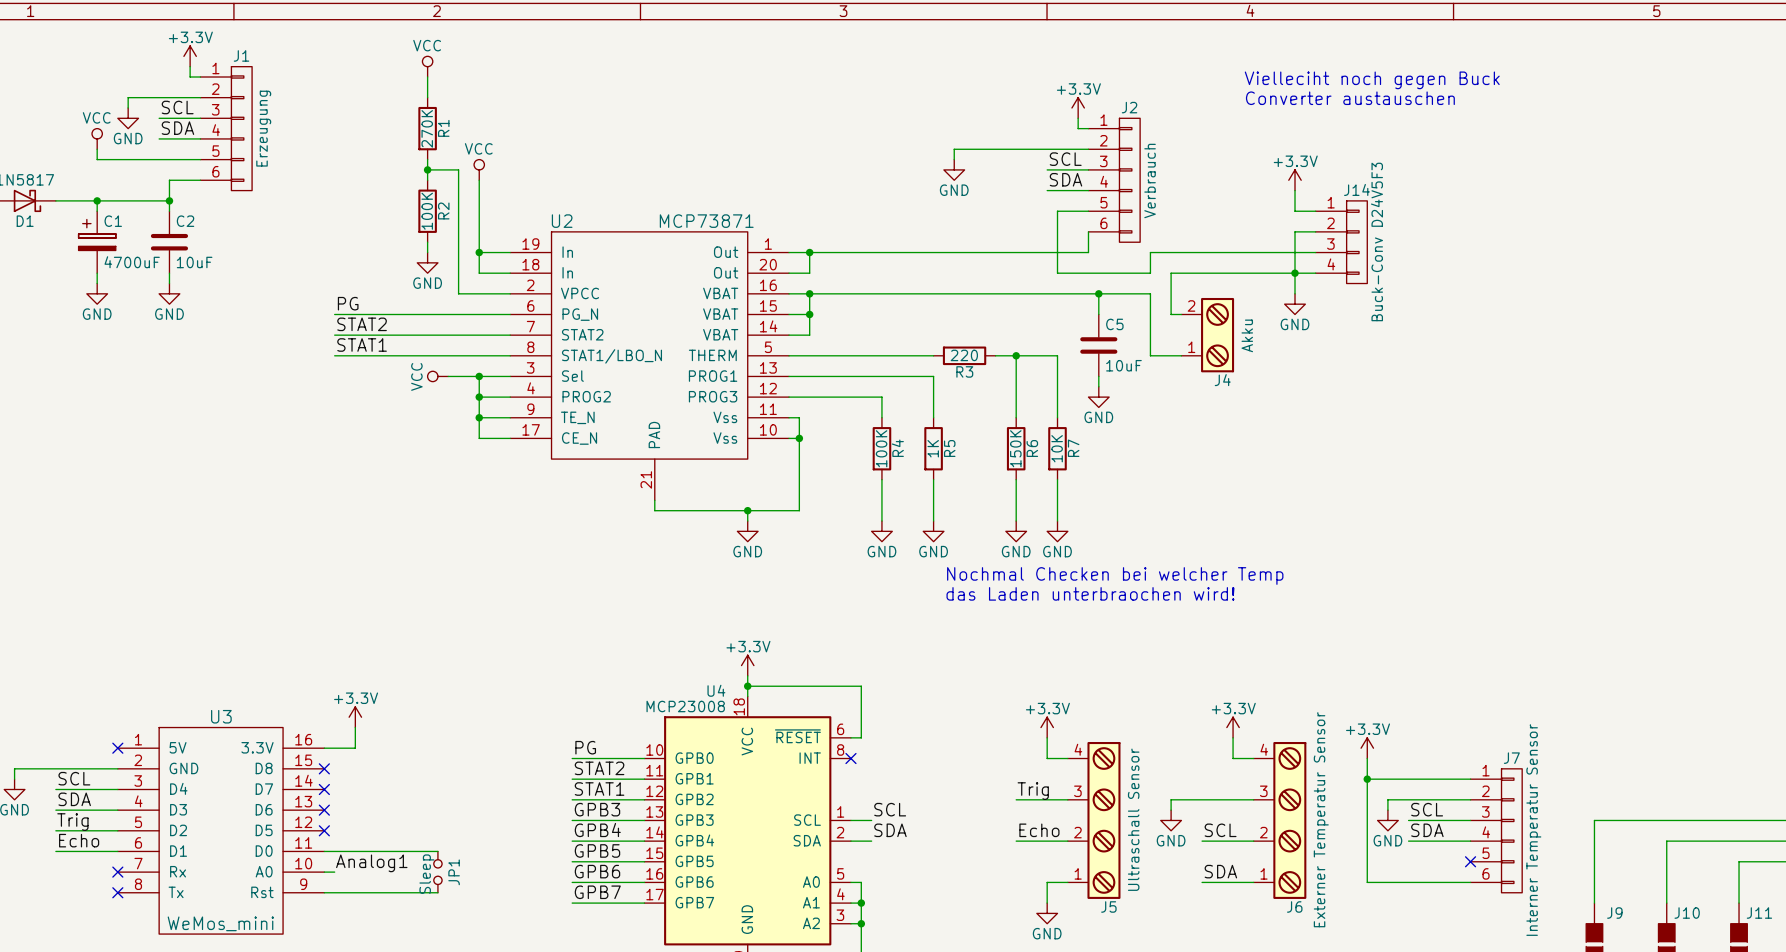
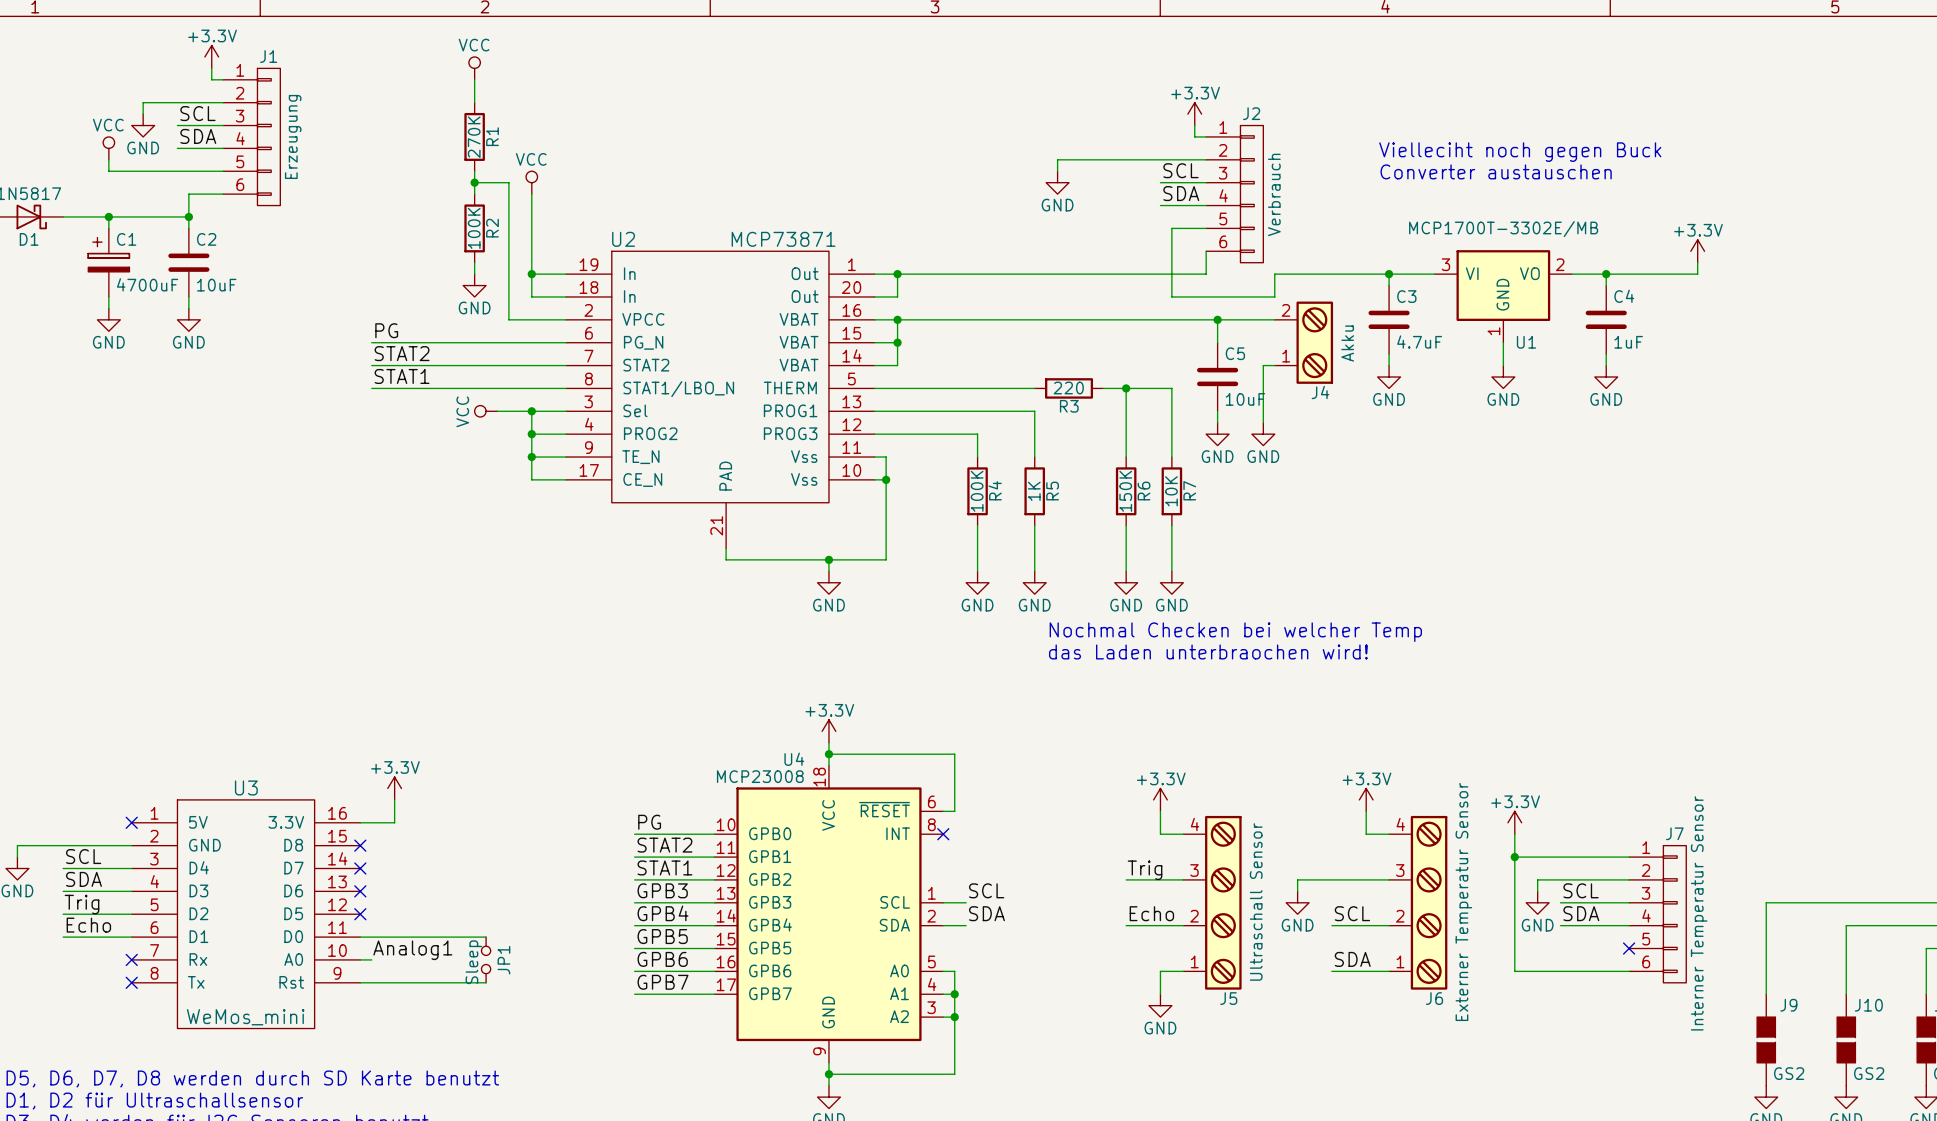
text position: Vielleciht noch gegen Buck (1372, 80) -> Vielleciht noch gegen Buck (1520, 152)
text position: Converter austauschen (1350, 98) -> Converter austauschen (1496, 171)
power symbol: +3.3V (1295, 180) -> none
wire: (1295, 190) (1295, 211) (1315, 211) -> none
wire: (1315, 231) (1295, 231) (1295, 293) -> none
power symbol: none -> +3.3V (1697, 251)
J14: Buck-Conv D24V5F3 (1341, 242) -> none
wire: none -> (1697, 262) (1697, 274) (1571, 274)
wire: none -> (1389, 274) (1389, 285)
wire: none -> (1606, 274) (1606, 285)
junction: none -> (1606, 274)
U1: none -> MCP1700T-3302E/MB (1503, 296)
junction position: (1295, 273) -> (1389, 274)
wire: (1315, 273) (1171, 273) (1171, 314) (1181, 314) -> none
wire: (1150, 293) (1150, 355) (1181, 355) -> none
C3: none -> 4.7uF (1389, 319)
C4: none -> 1uF (1606, 319)
power symbol: GND (1295, 304) -> none
wire: none -> (1503, 342) (1503, 365)
wire: none -> (1389, 354) (1389, 365)
wire: none -> (1606, 354) (1606, 365)
wire: none -> (1274, 365) (1263, 365) (1263, 422)
J4 position: (1207, 335) -> (1303, 342)
power symbol: none -> GND (1389, 377)
power symbol: none -> GND (1503, 377)
power symbol: none -> GND (1606, 377)
power symbol: none -> GND (1263, 434)

